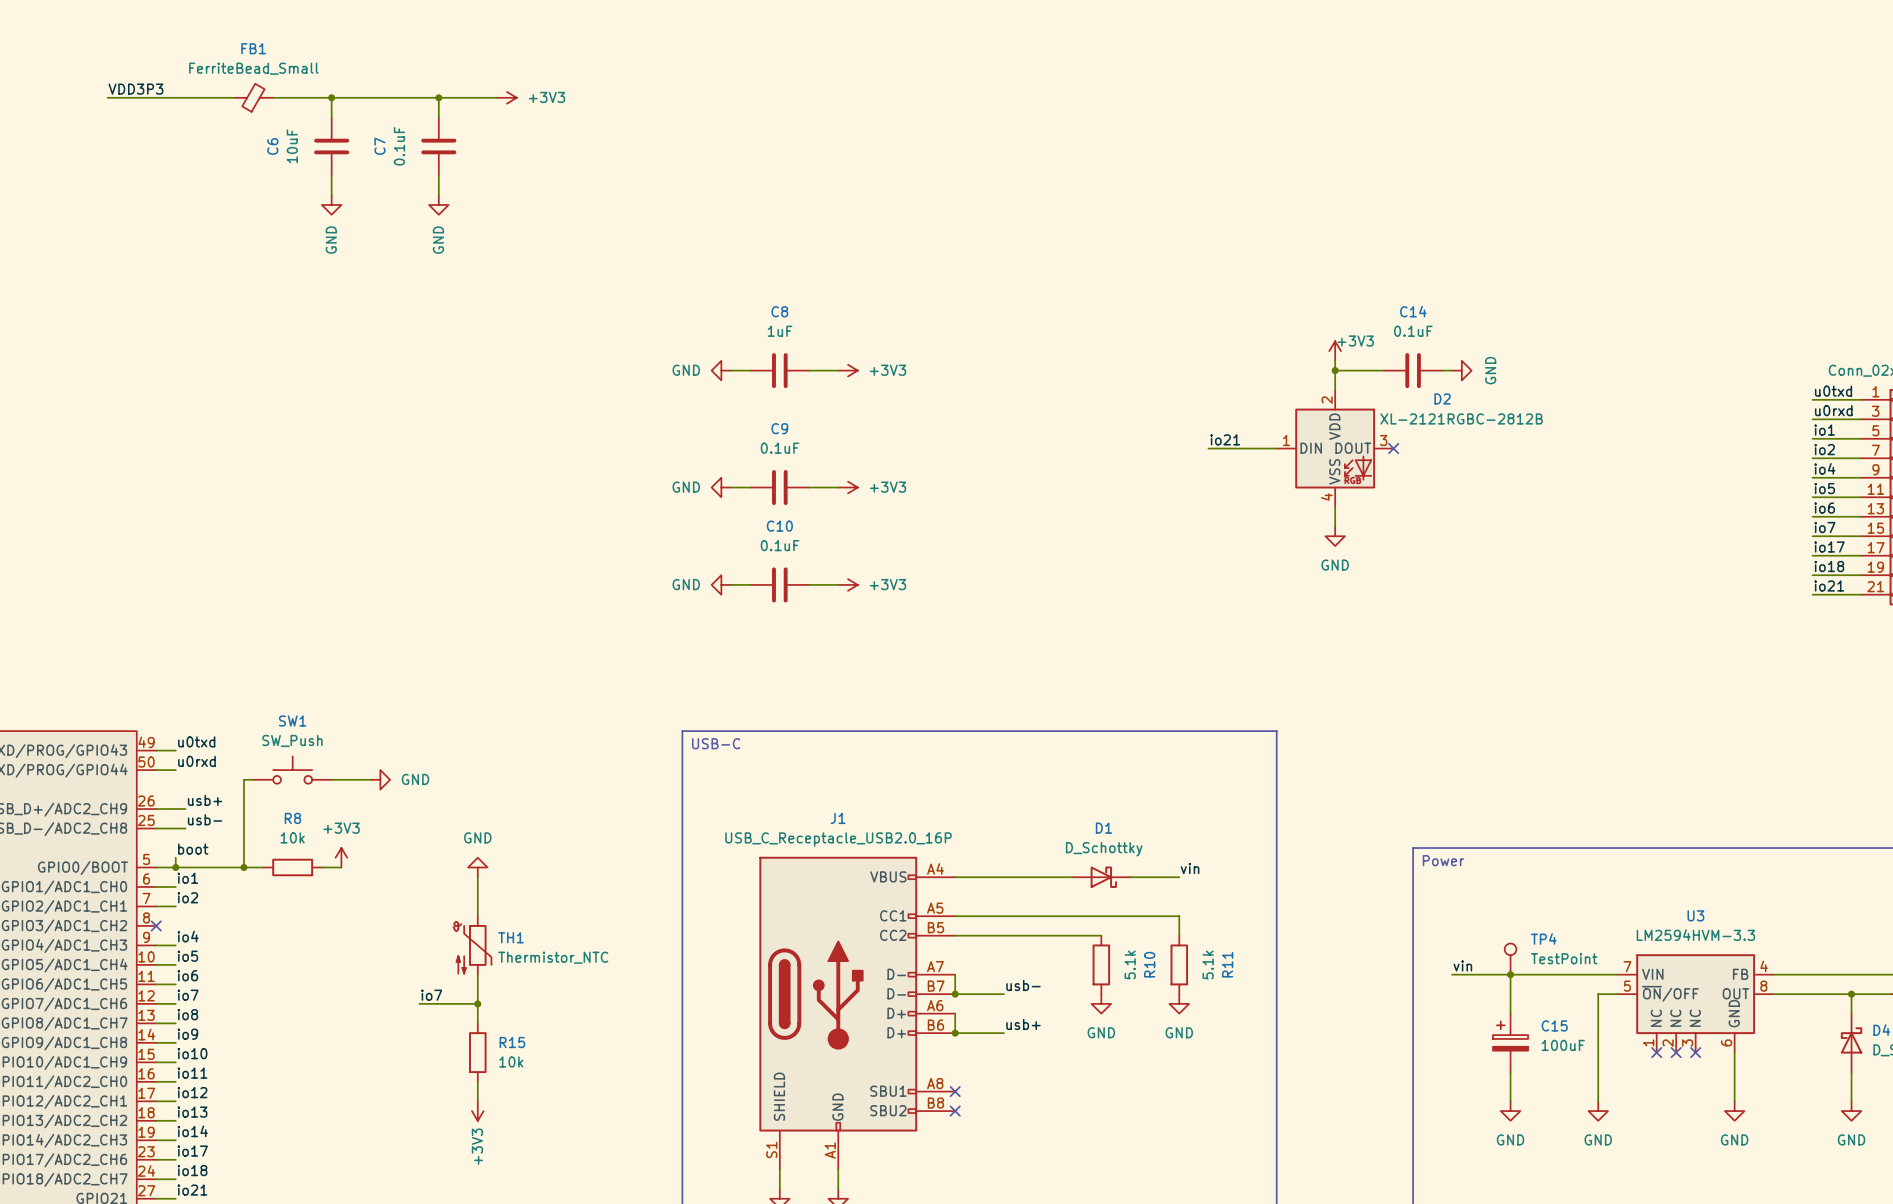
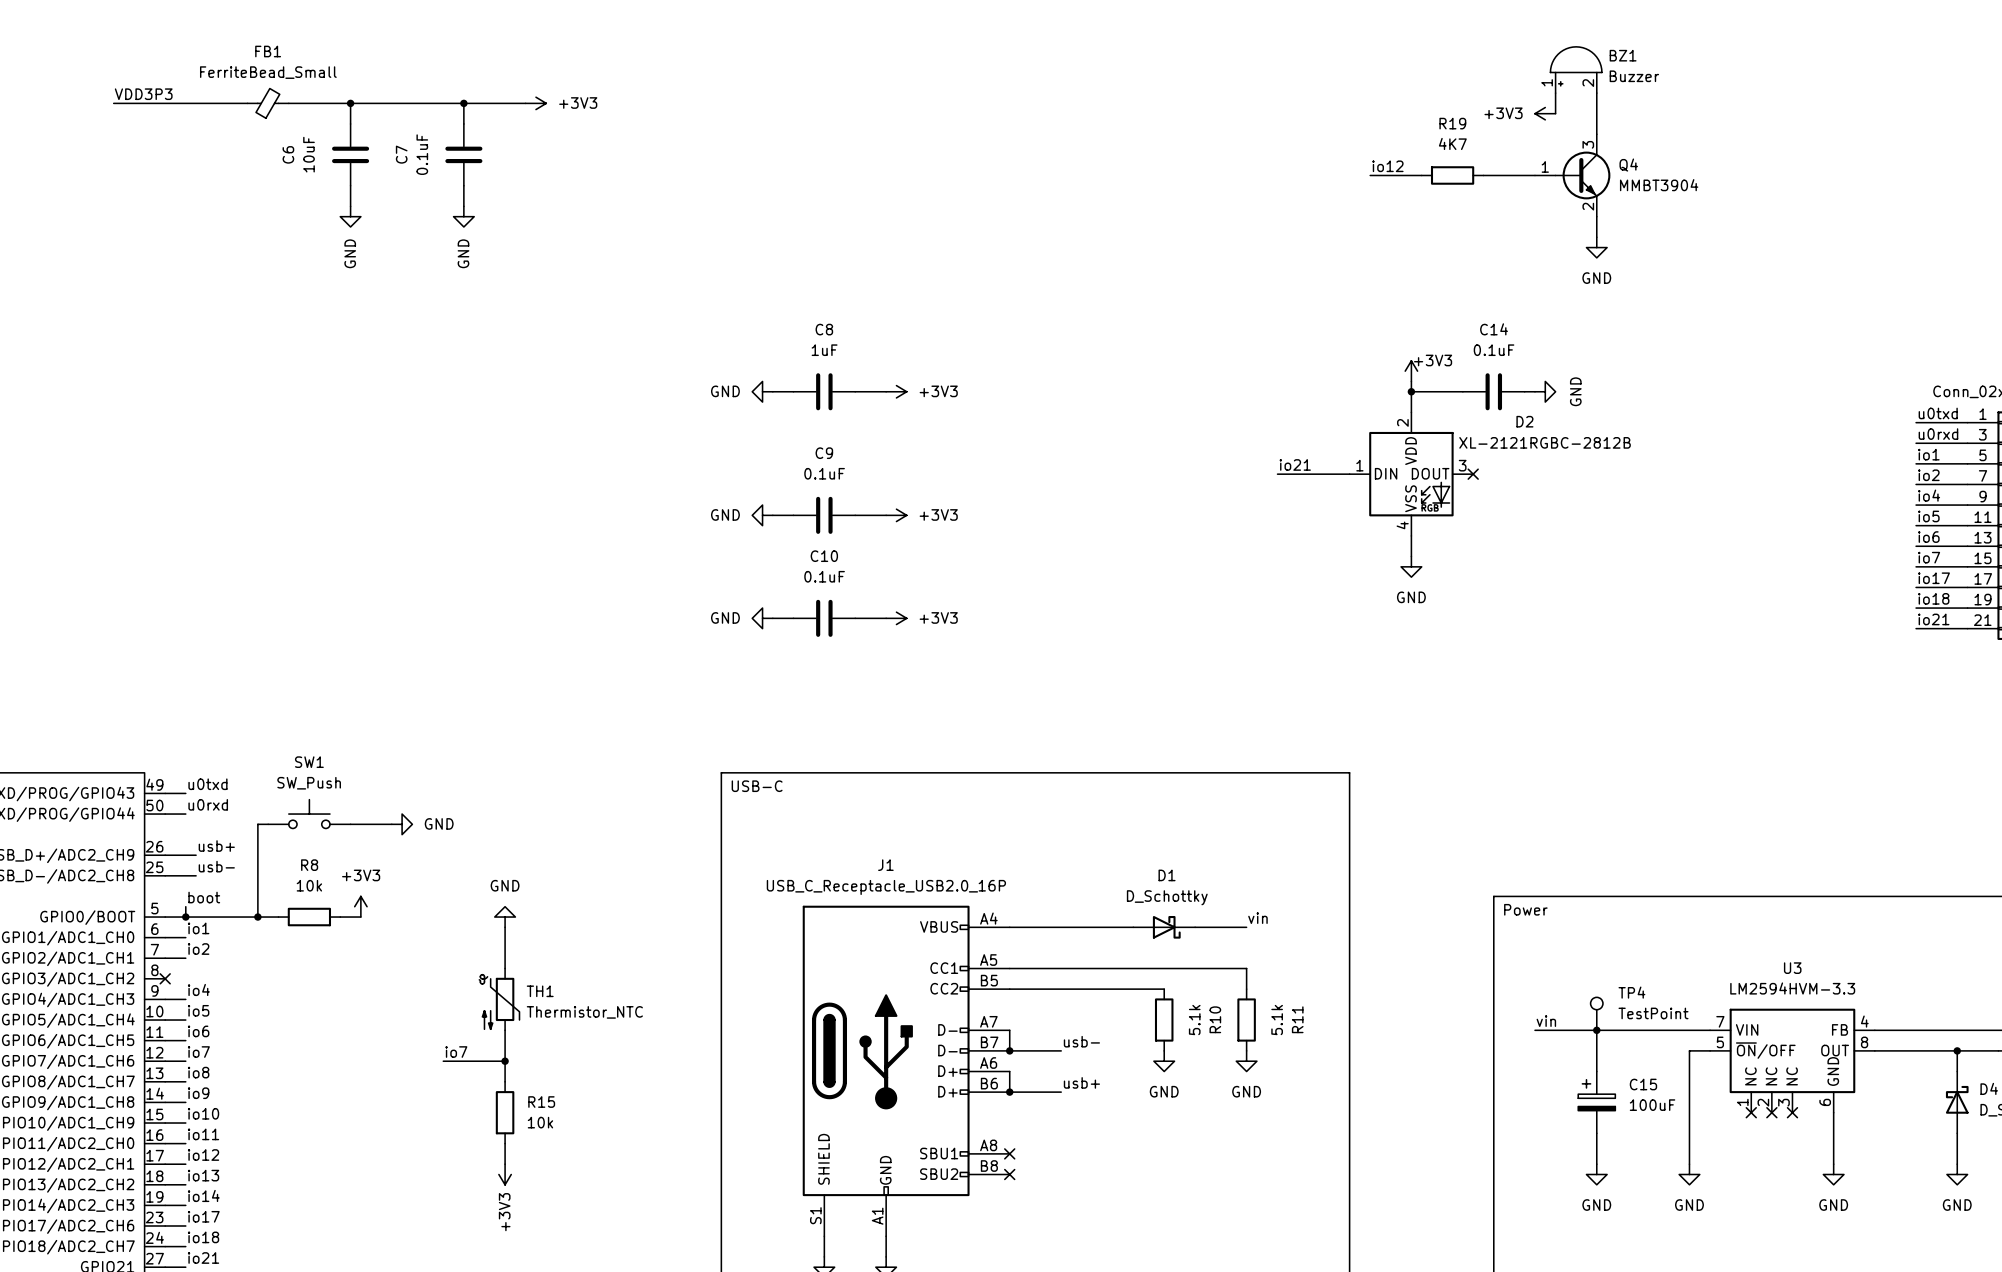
BZ1: none -> Buzzer (1576, 69)
wire: none -> (1555, 93) (1555, 113)
wire: none -> (1596, 93) (1596, 134)
power symbol: none -> +3V3 (1545, 113)
label: none -> io12 (1387, 166)
wire: none -> (1370, 175) (1421, 175)
R19: none -> 4K7 (1452, 175)
wire: none -> (1483, 175) (1534, 175)
Q4: none -> MMBT3904 (1572, 175)
wire: none -> (1596, 216) (1596, 237)
power symbol: none -> GND (1596, 247)

